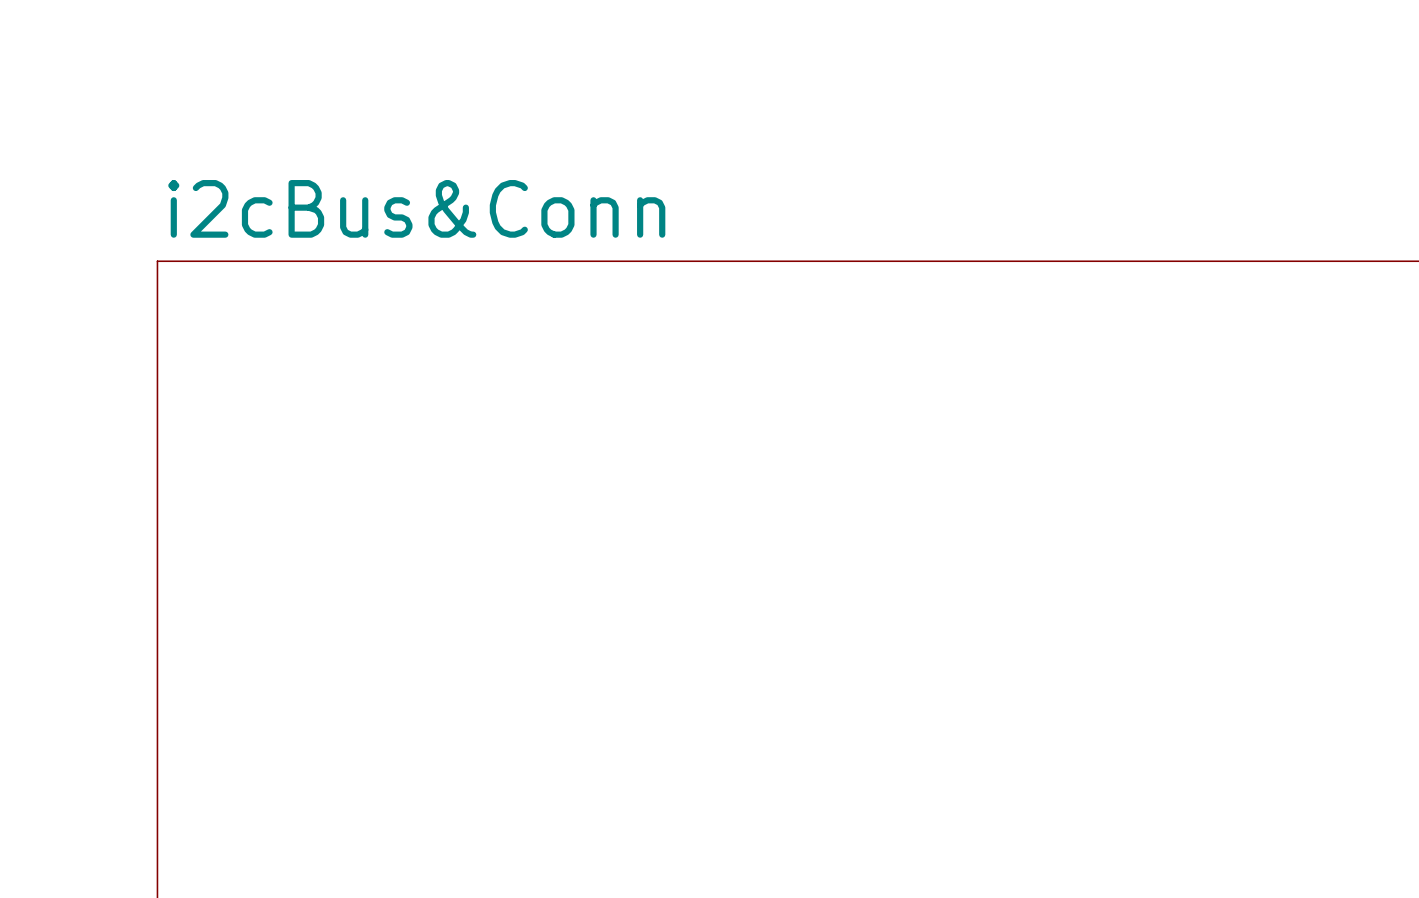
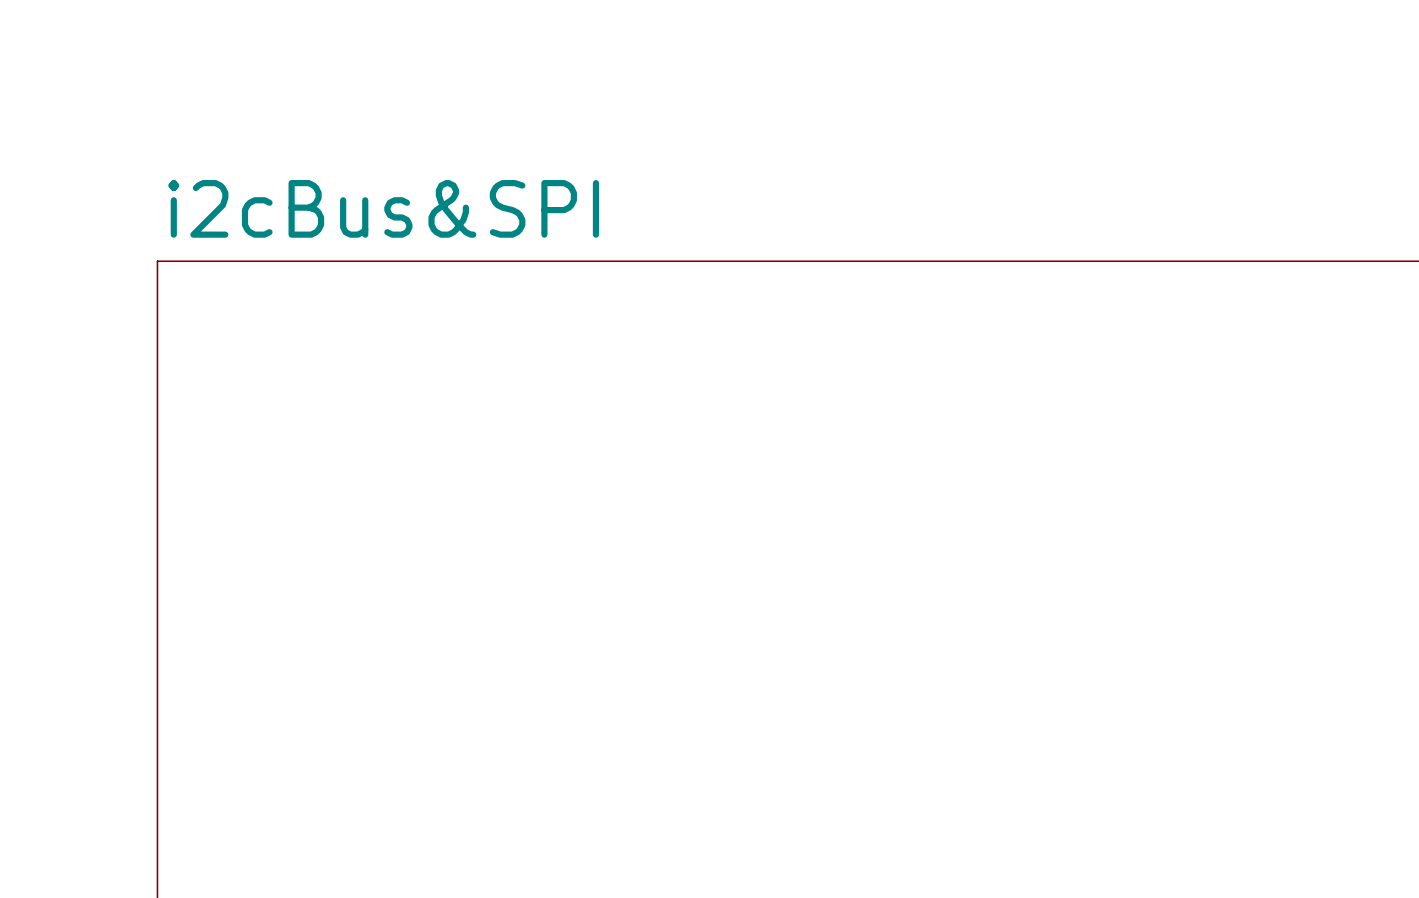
sheet i2cBus&Conn name: i2cBus&Conn (416, 208) -> i2cBus&SPI (383, 208)

